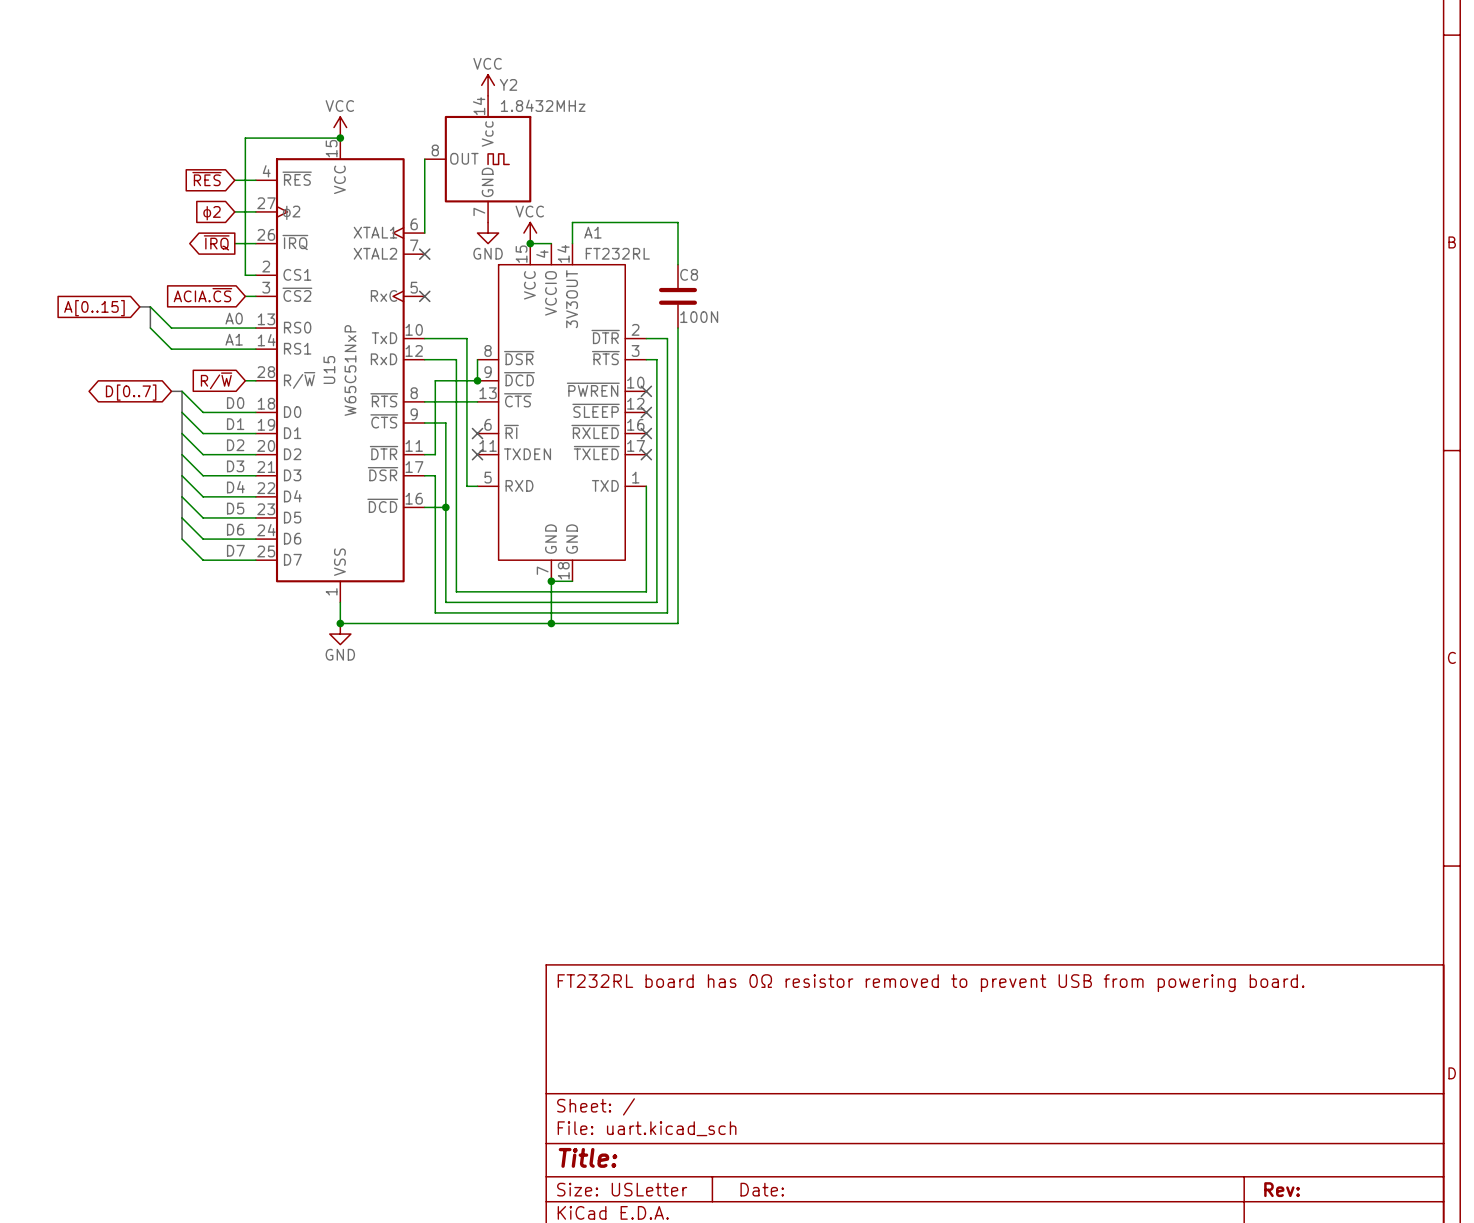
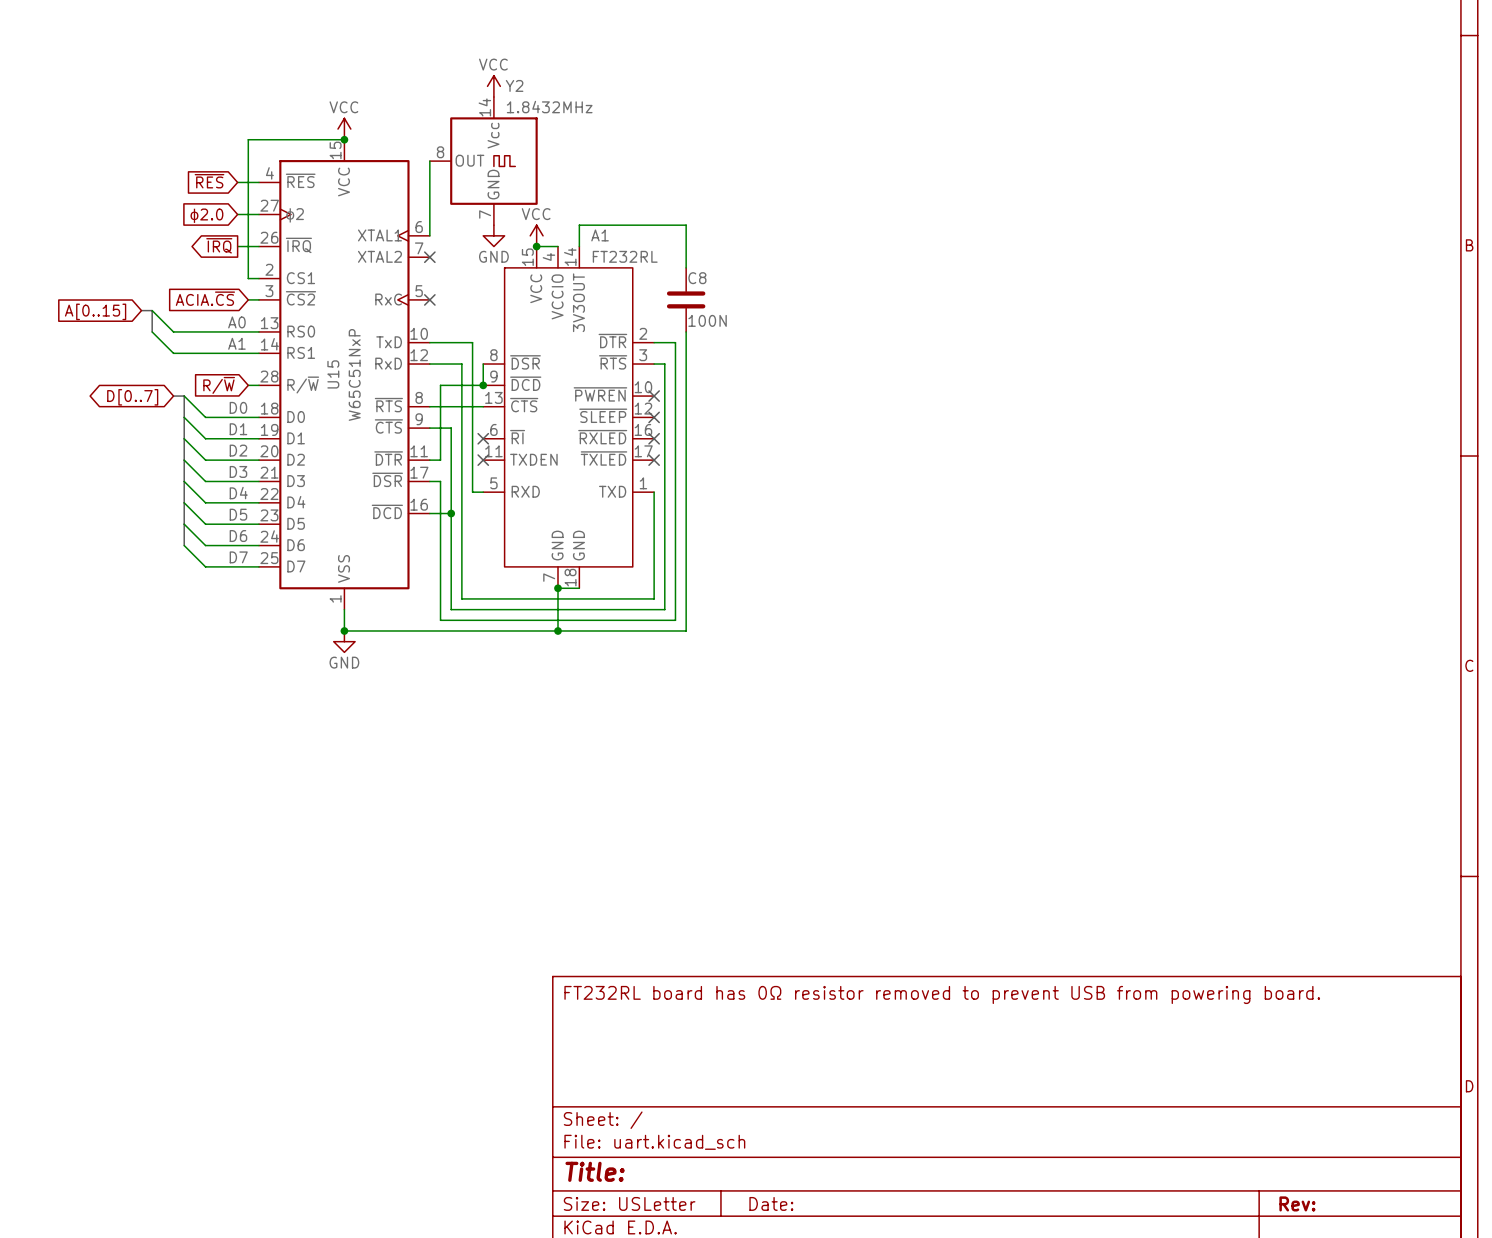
global label: ϕ2 (211, 213) -> ϕ2.0 (206, 215)

